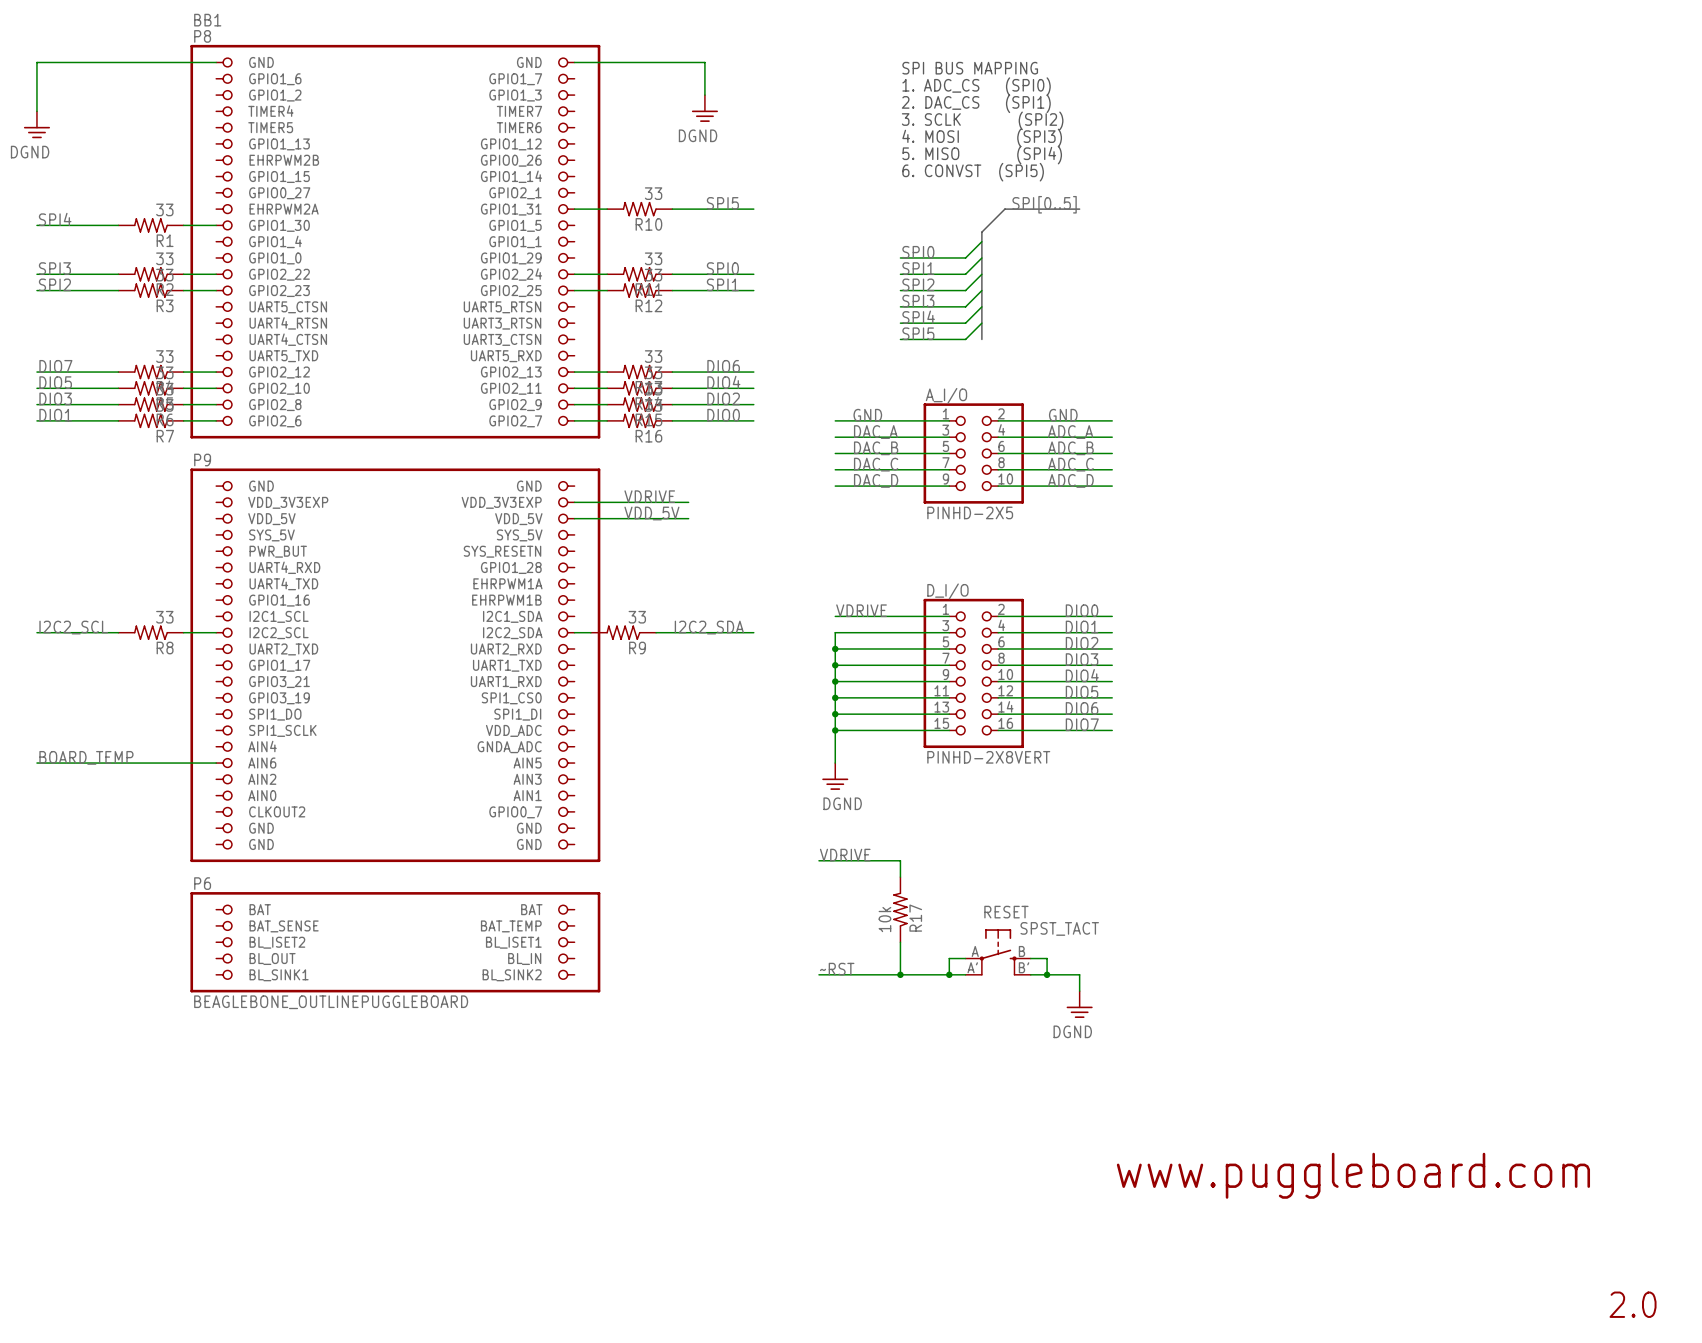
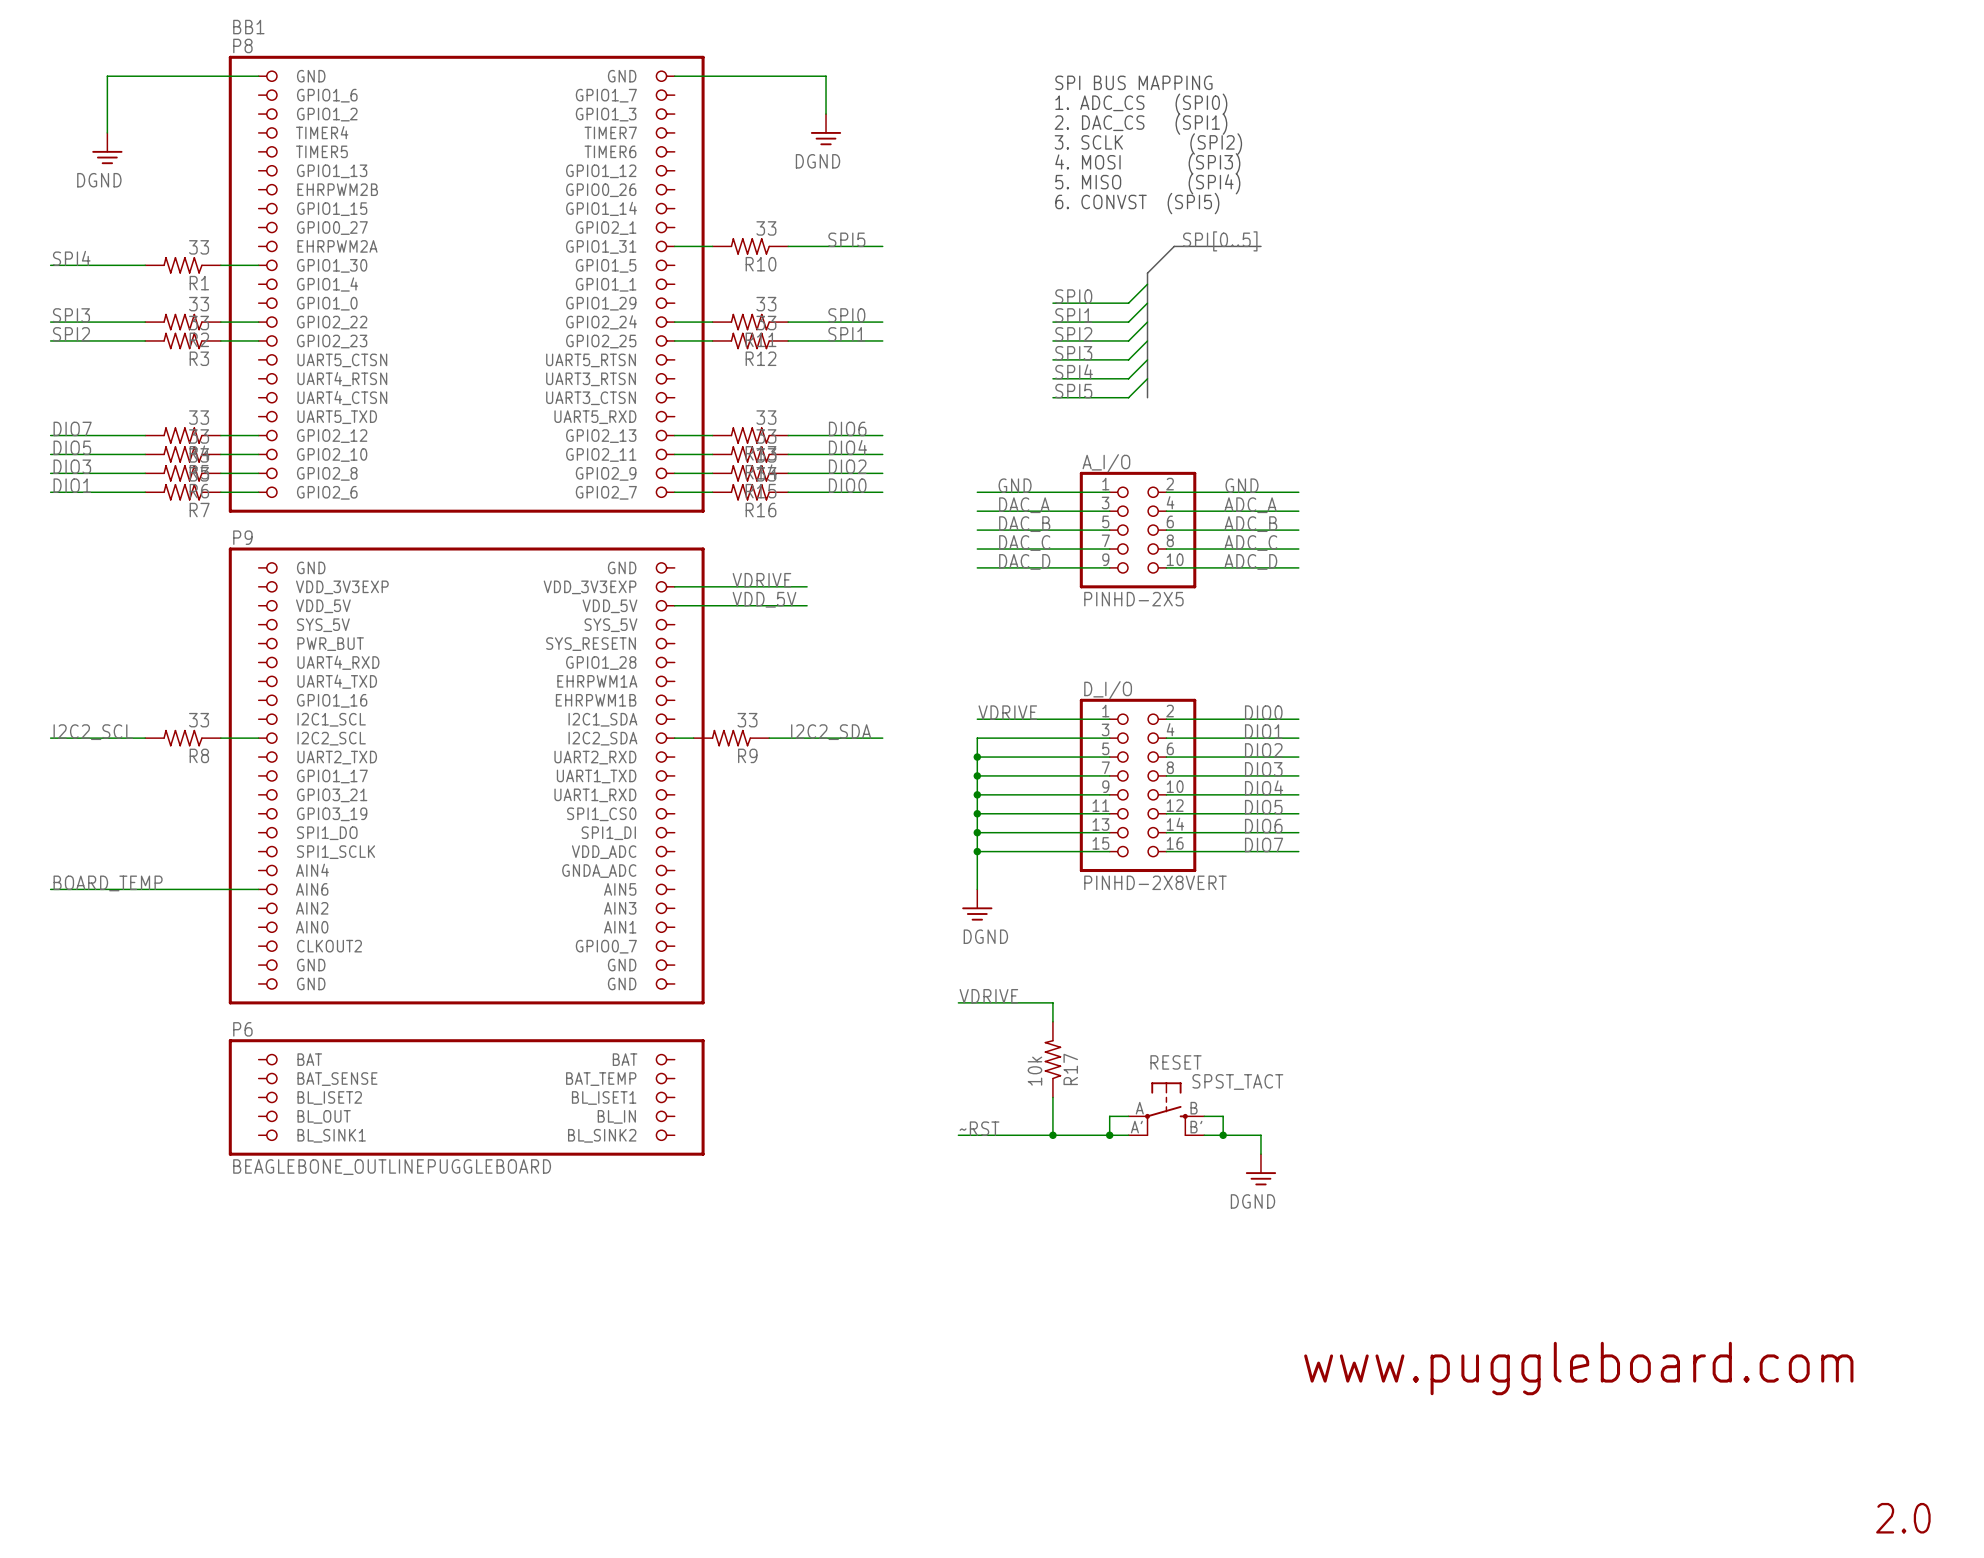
wire: (85, 62) (36, 62) (36, 111) -> (107, 76) (107, 132)
power symbol position: DGND (36, 124) -> DGND (107, 148)

